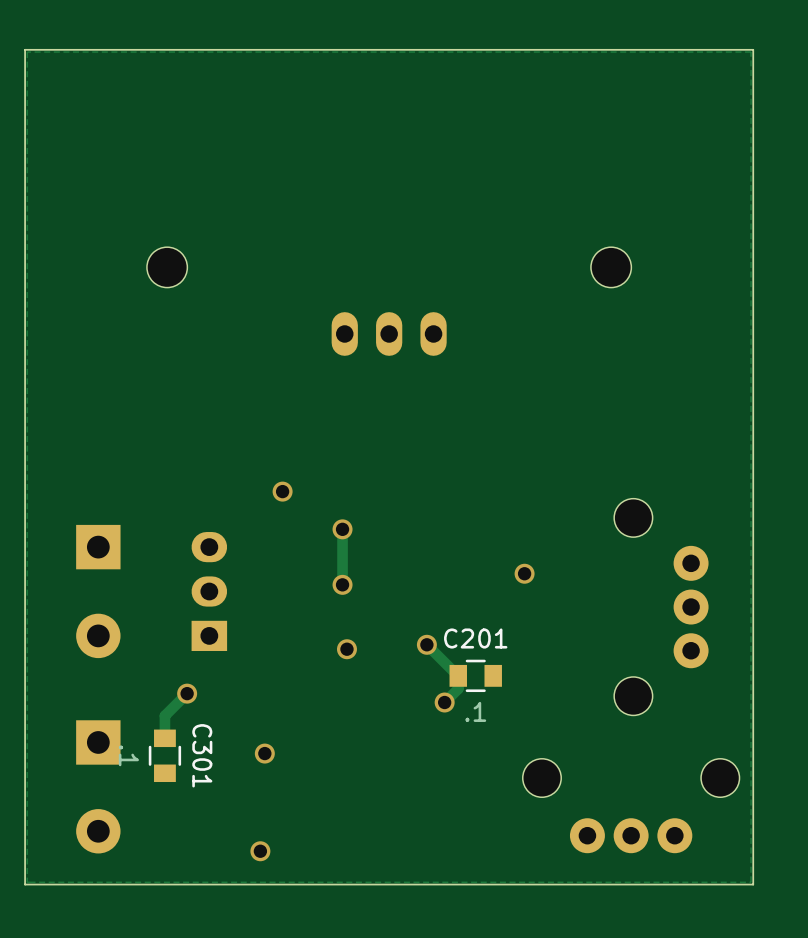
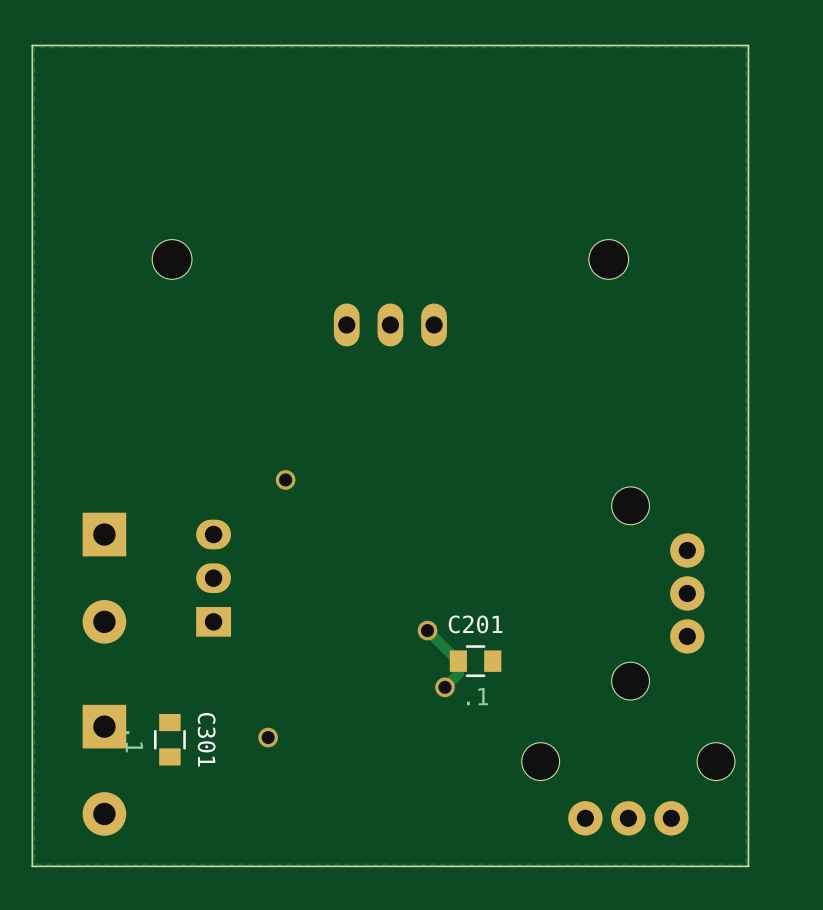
track: (342, 529) (342, 584) -> none
via: (342, 529) -> none
via: (524, 573) -> none
via: (342, 584) -> none
via: (346, 649) -> none
track: (187, 693) (164, 715) (164, 738) -> none
via: (187, 693) -> none
via: (260, 851) -> none

